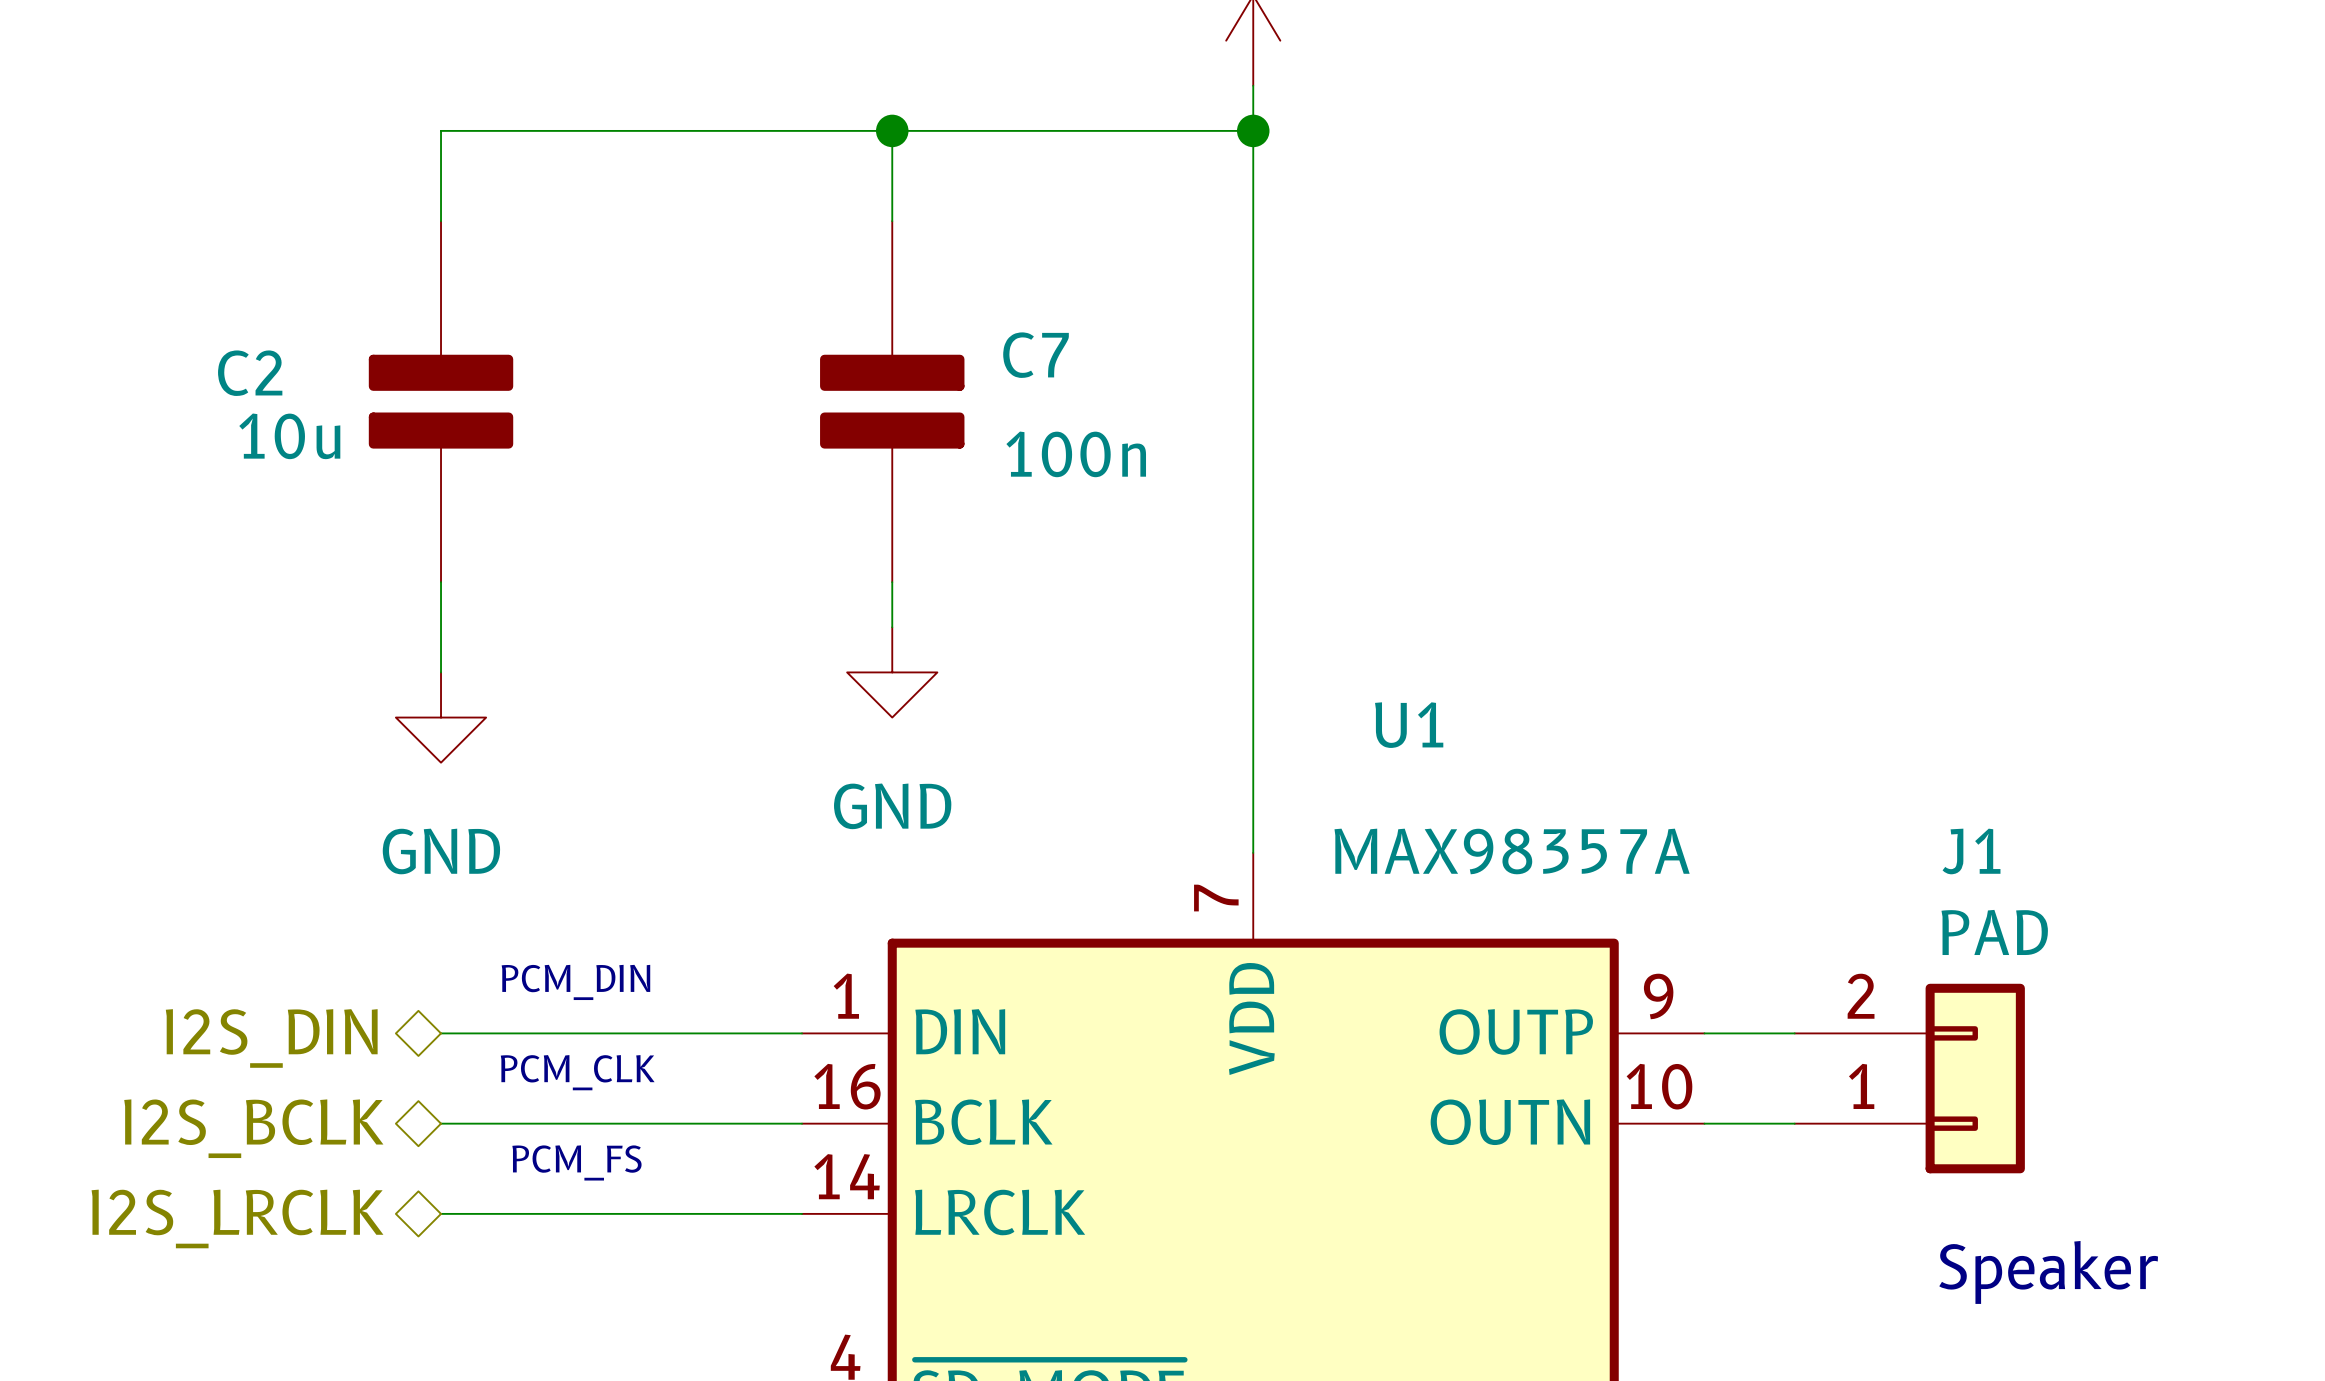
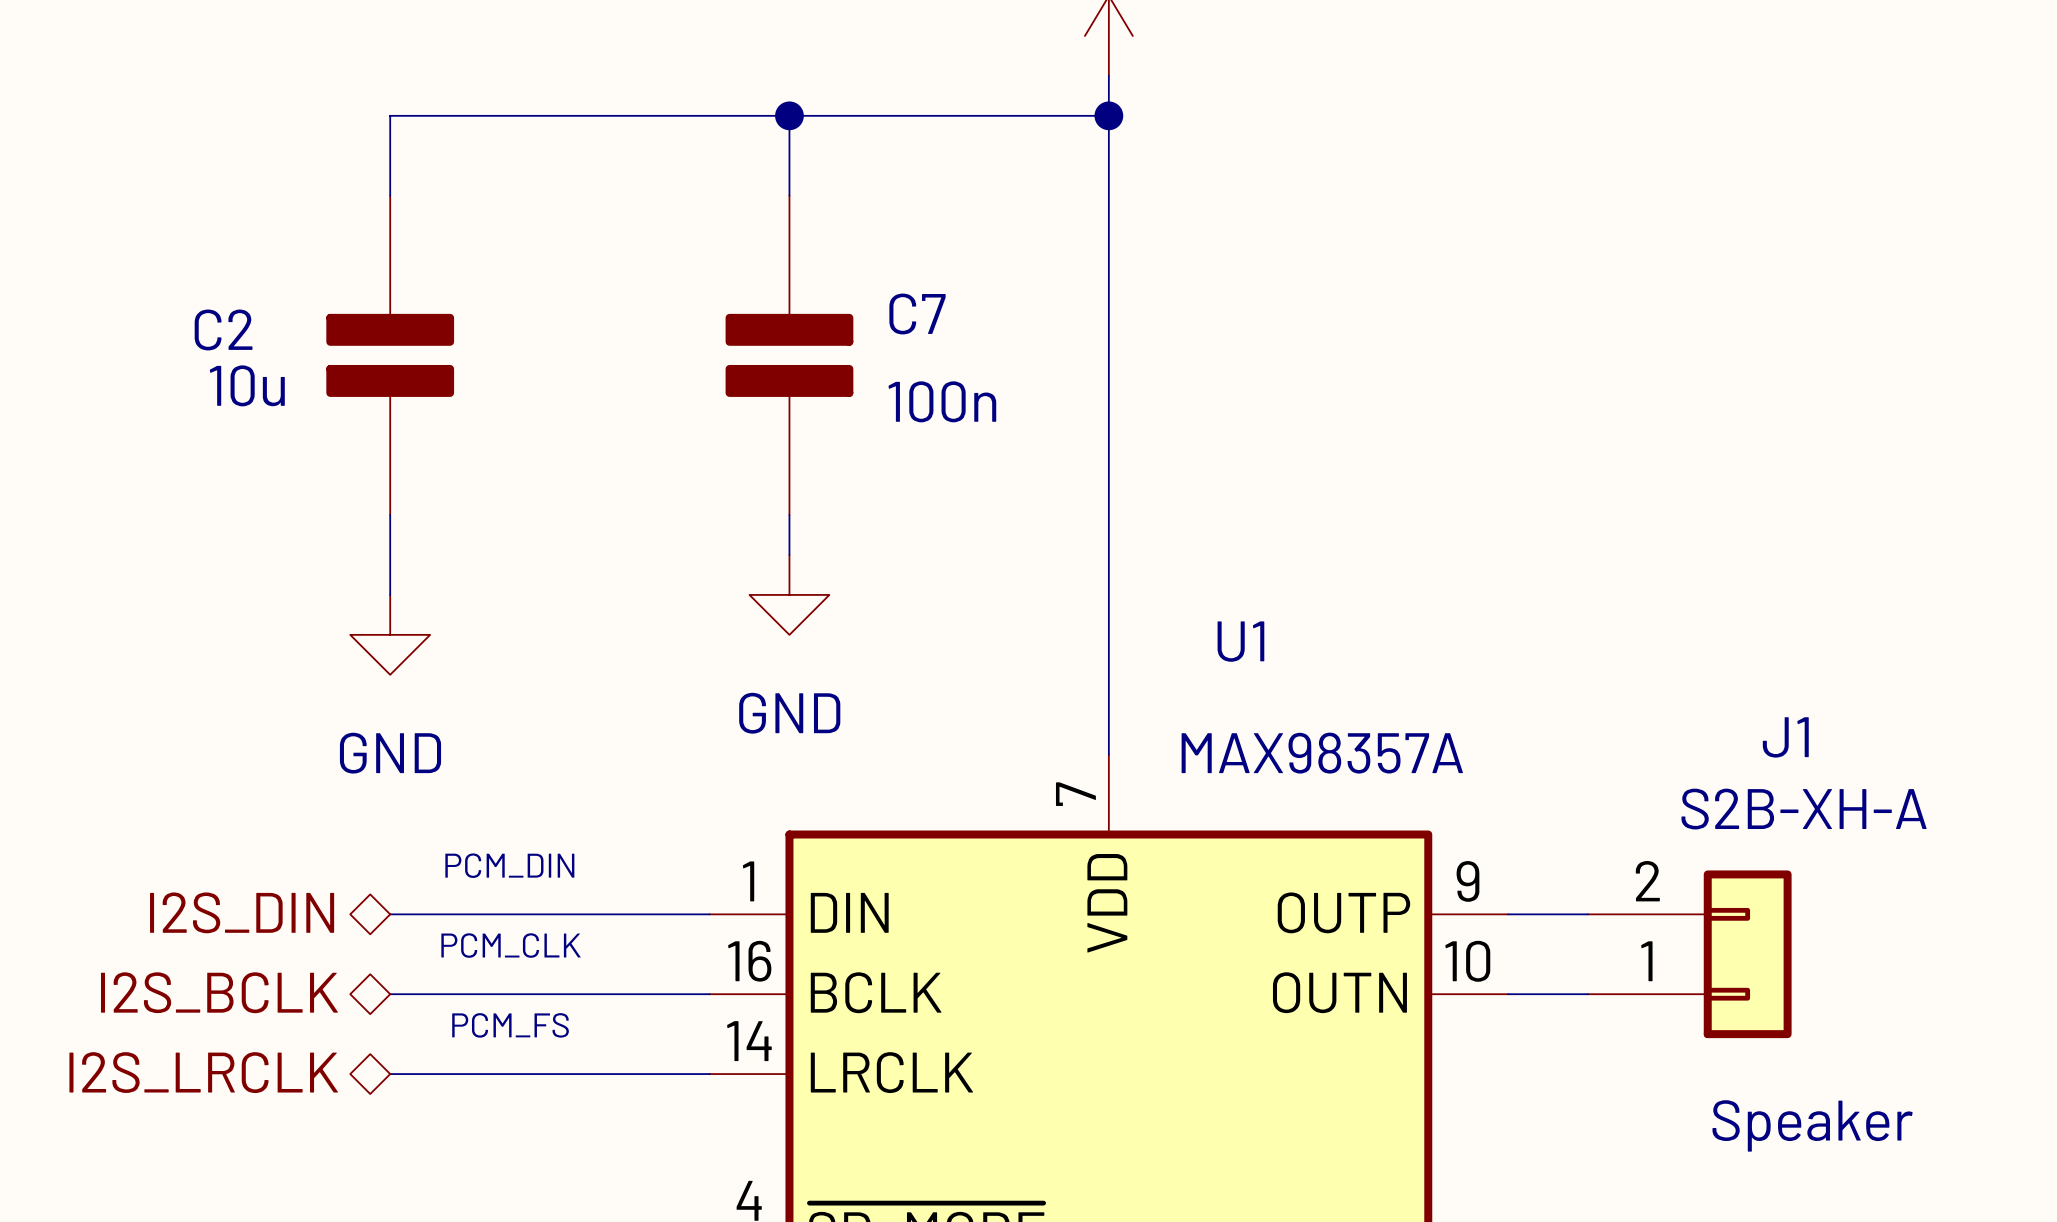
J1 name position: J1 (1971, 851) -> J1 (1785, 737)
J1 value: PAD (1994, 932) -> S2B-XH-A (1804, 809)

